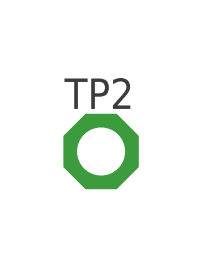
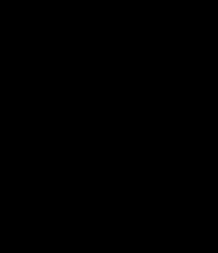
TP2: (101, 151) -> none

